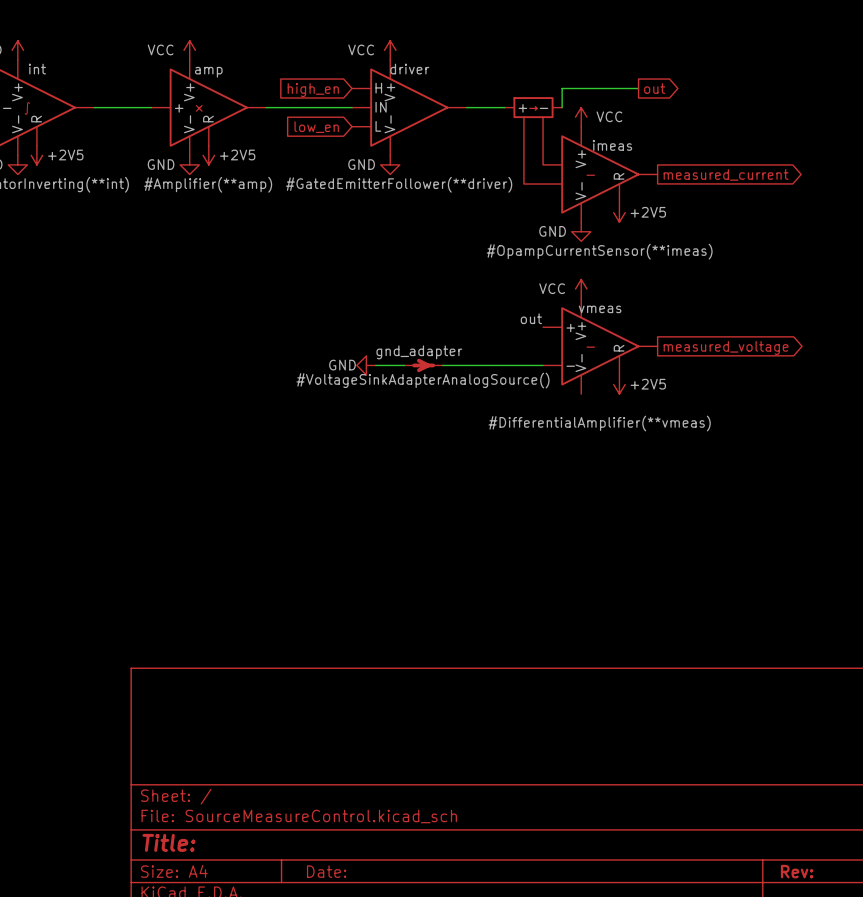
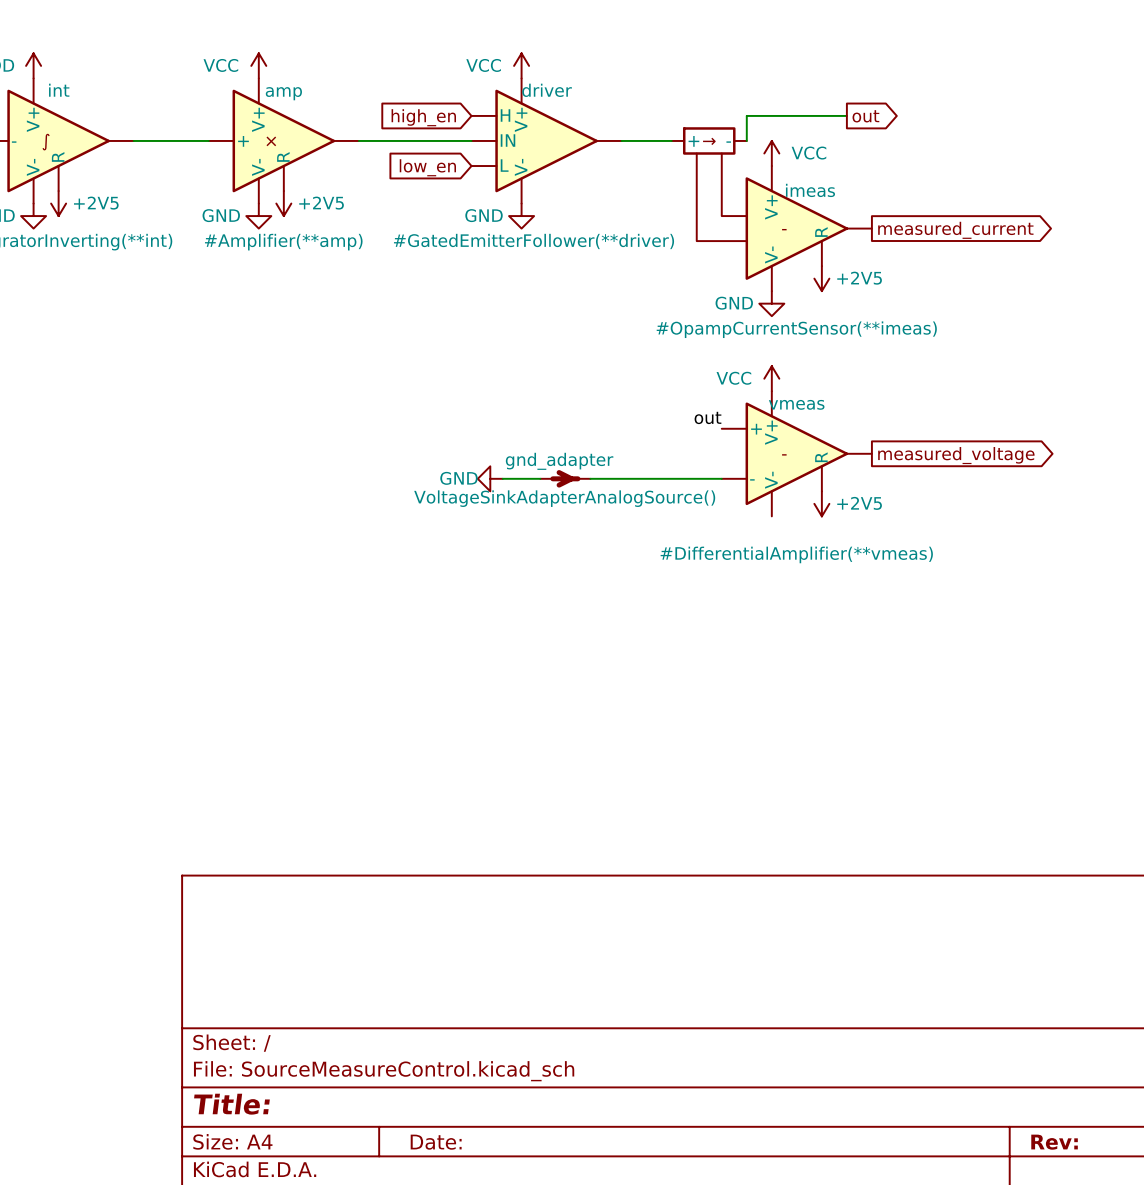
gnd_adapter value: #VoltageSinkAdapterAnalogSource() (422, 380) -> VoltageSinkAdapterAnalogSource() (564, 498)

